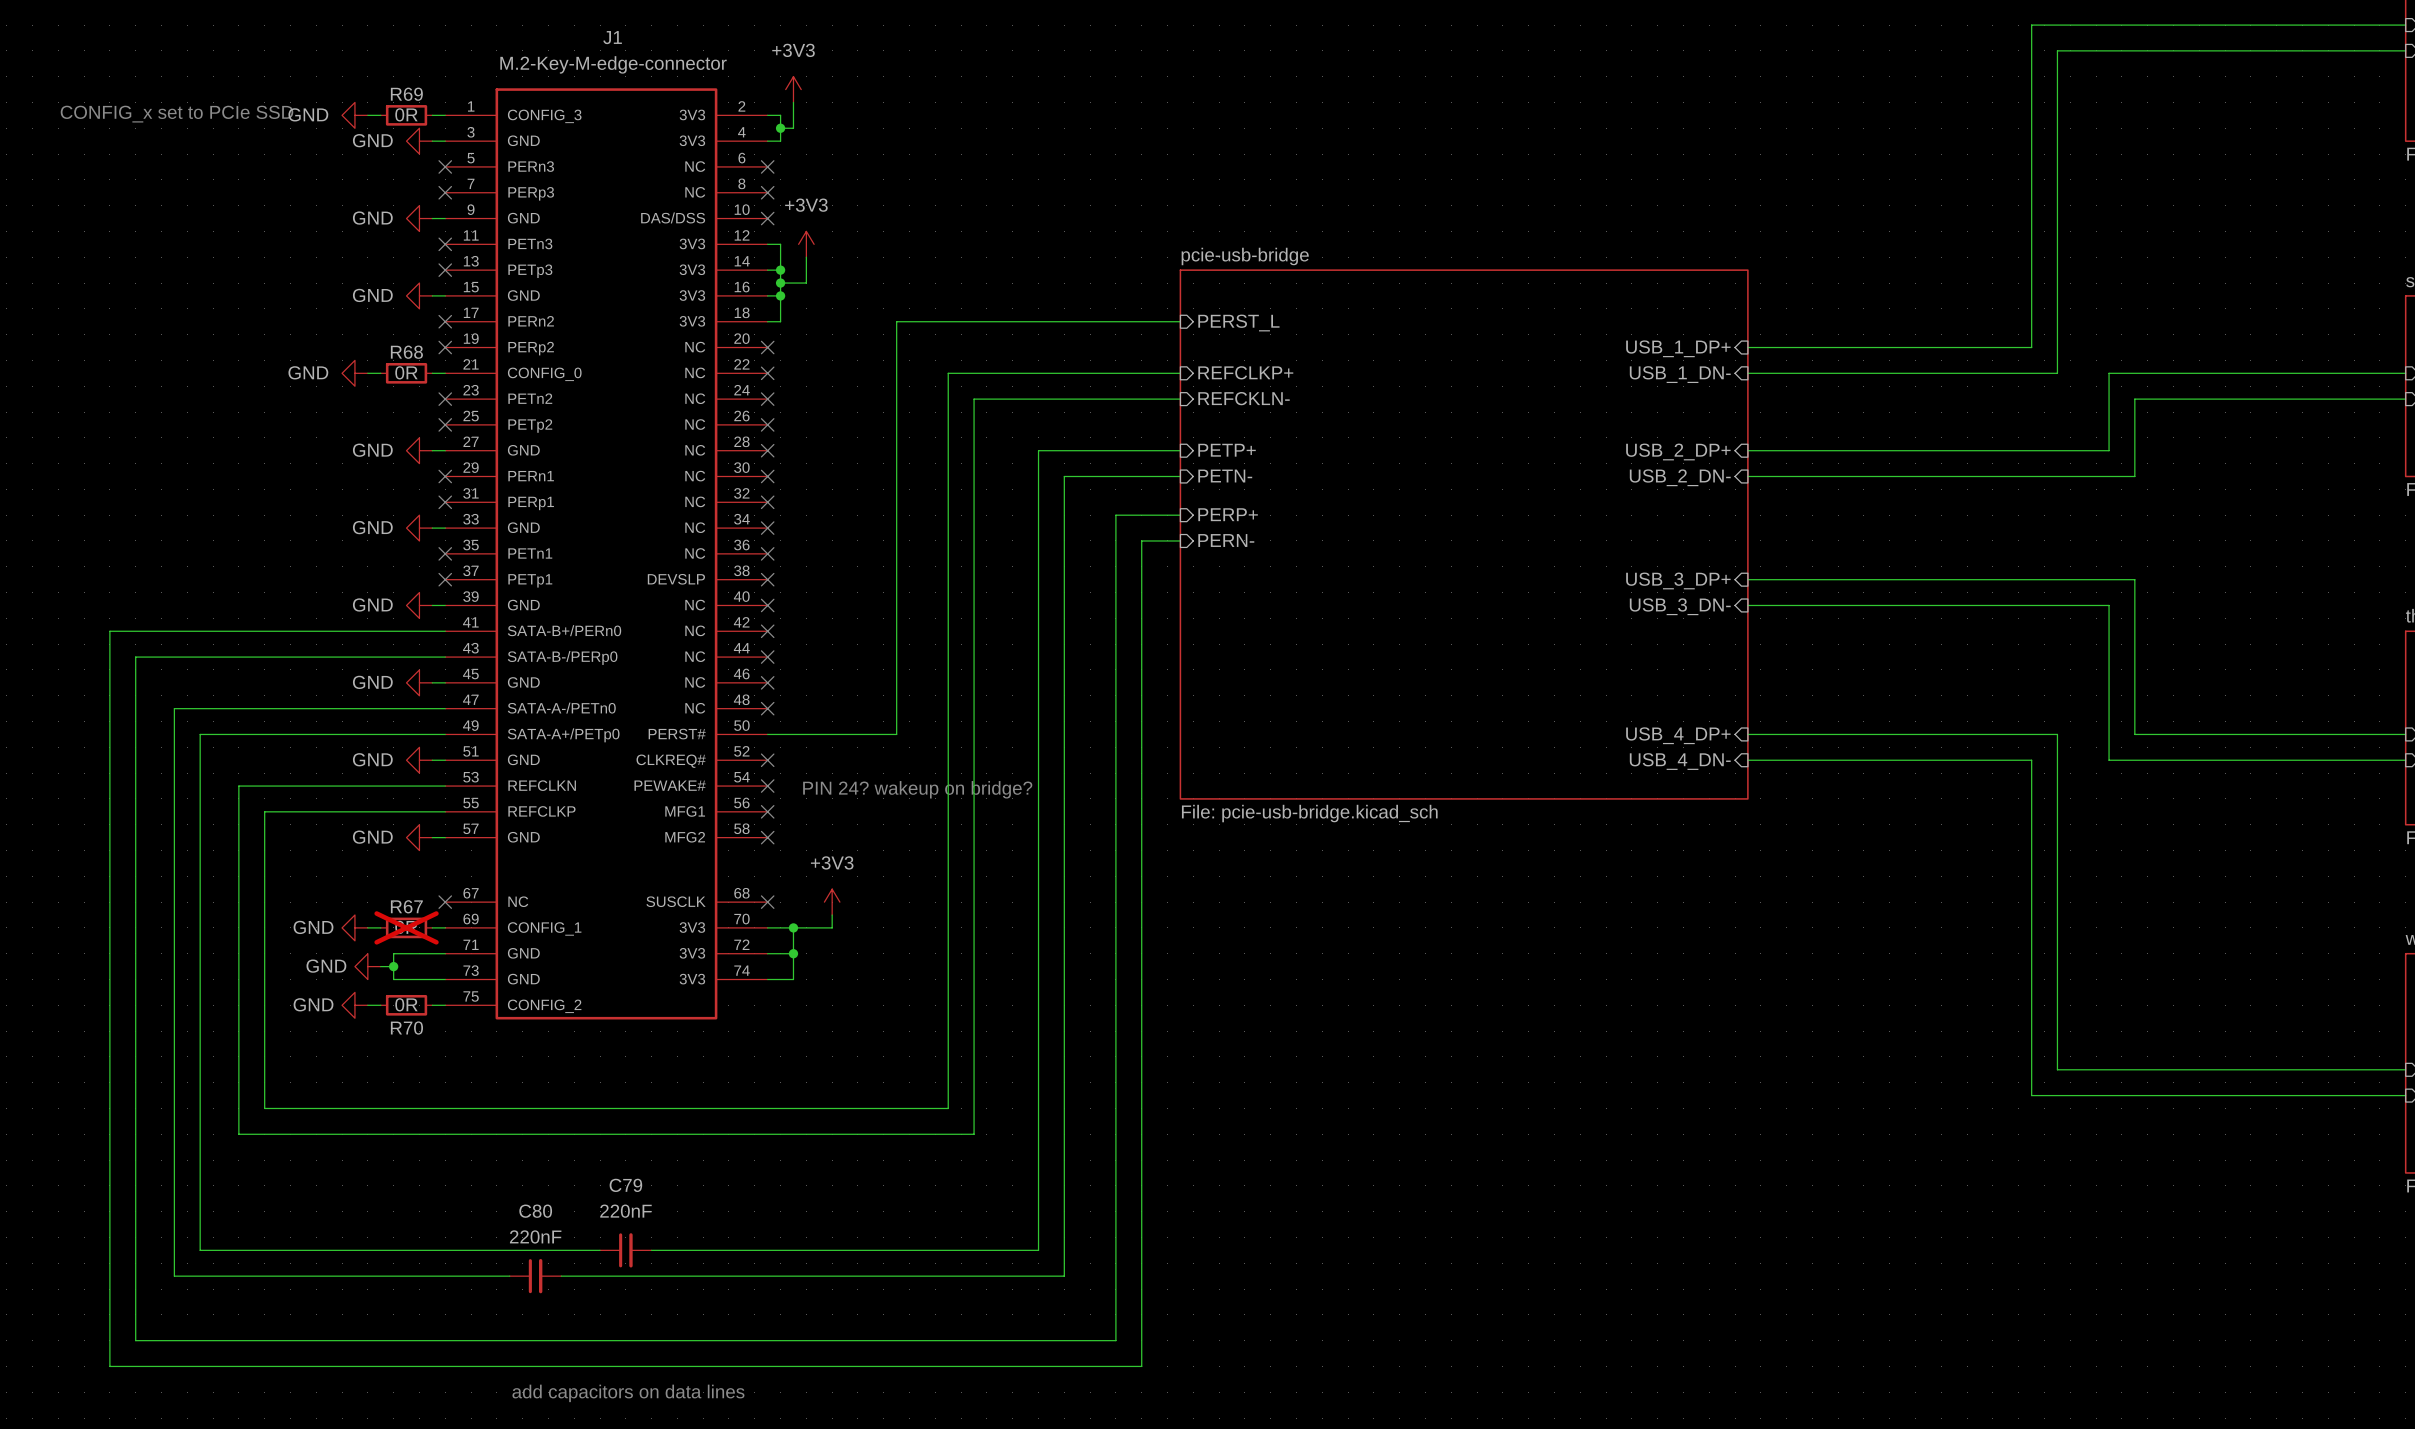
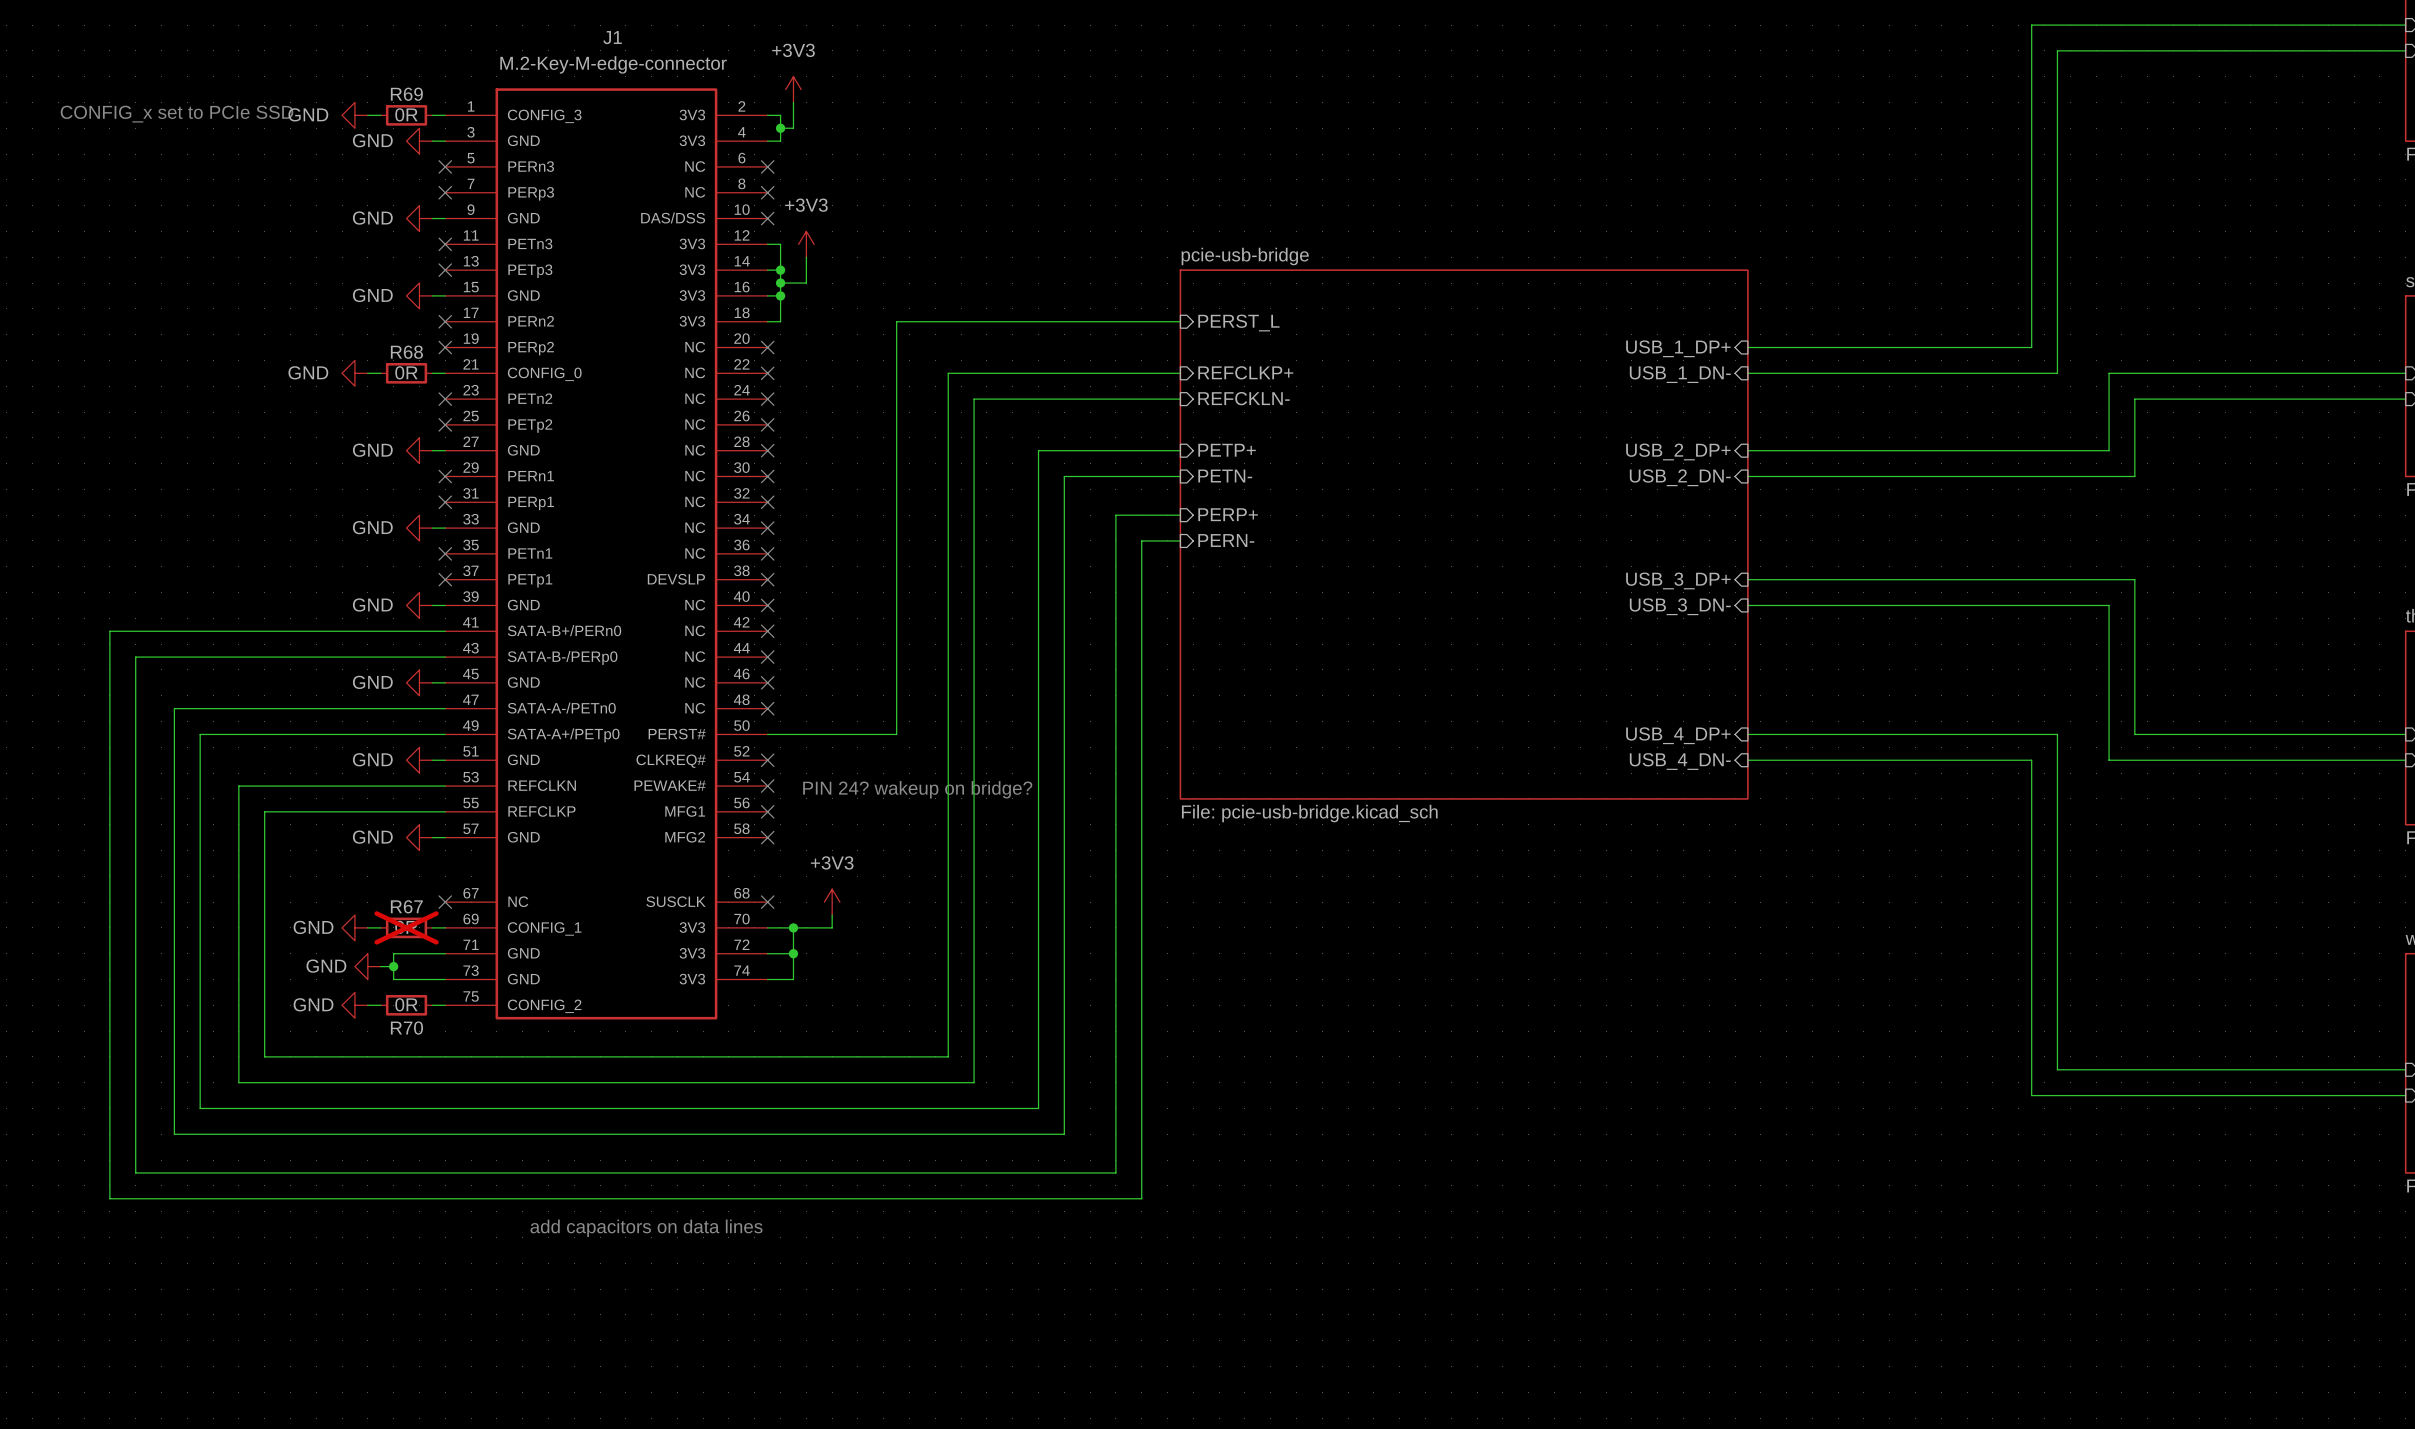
wire: (264, 1056) (264, 1108) -> (200, 1108) (264, 1108)
wire: none -> (264, 1056) (948, 1056)
wire: (948, 1056) (948, 1108) -> (1038, 1108) (948, 1108)
wire: (238, 1082) (238, 1134) -> (174, 1134) (238, 1134)
wire: none -> (238, 1082) (974, 1082)
wire: (974, 1082) (974, 1134) -> (1064, 1134) (974, 1134)
wire: (200, 1108) (200, 1250) (600, 1250) -> none
wire: (1038, 1108) (1038, 1250) (651, 1250) -> none
wire: (174, 1134) (174, 1276) (509, 1276) -> none
wire: (1064, 1134) (1064, 1276) (561, 1276) -> none
wire: (135, 1172) (135, 1340) (1115, 1340) (1115, 1172) -> (135, 1172) (1115, 1172)
wire: (109, 1198) (109, 1366) (1141, 1366) (1141, 1198) -> (109, 1198) (1141, 1198)
C79: (625, 1250) -> none
C80: (535, 1276) -> none
text position: add capacitors on data lines (628, 1393) -> add capacitors on data lines (646, 1228)

